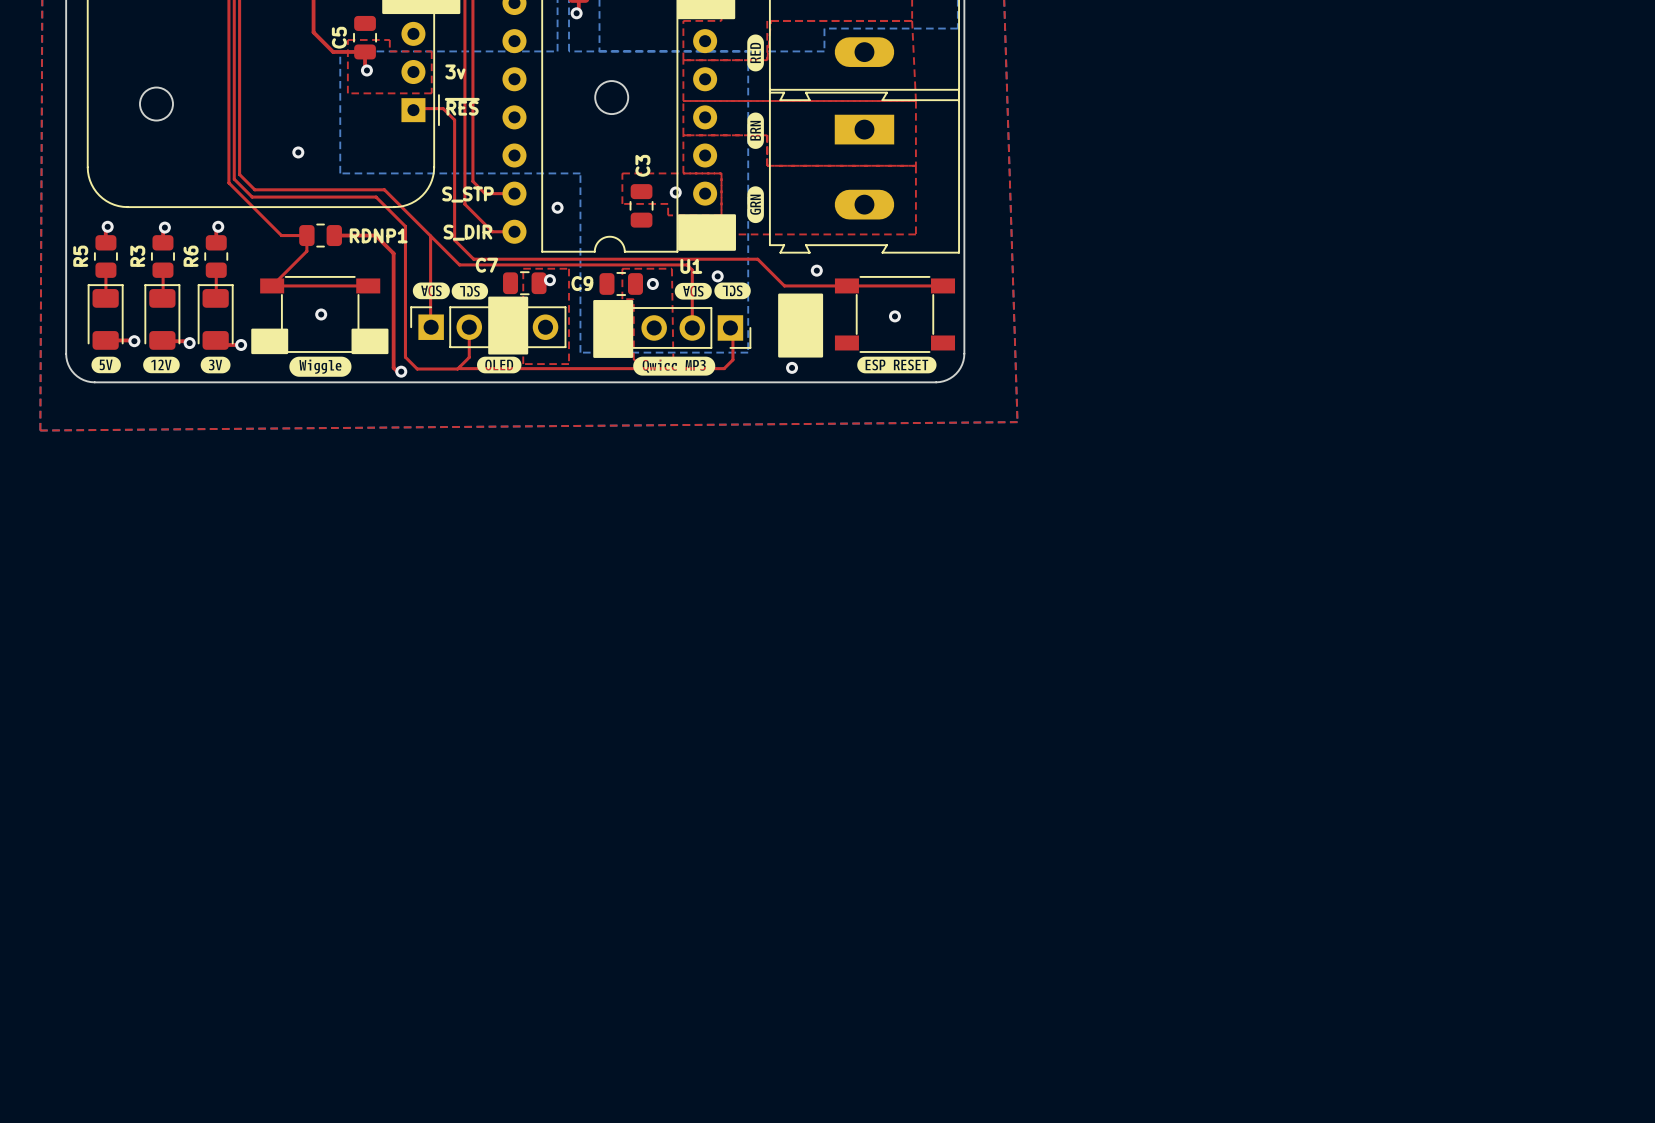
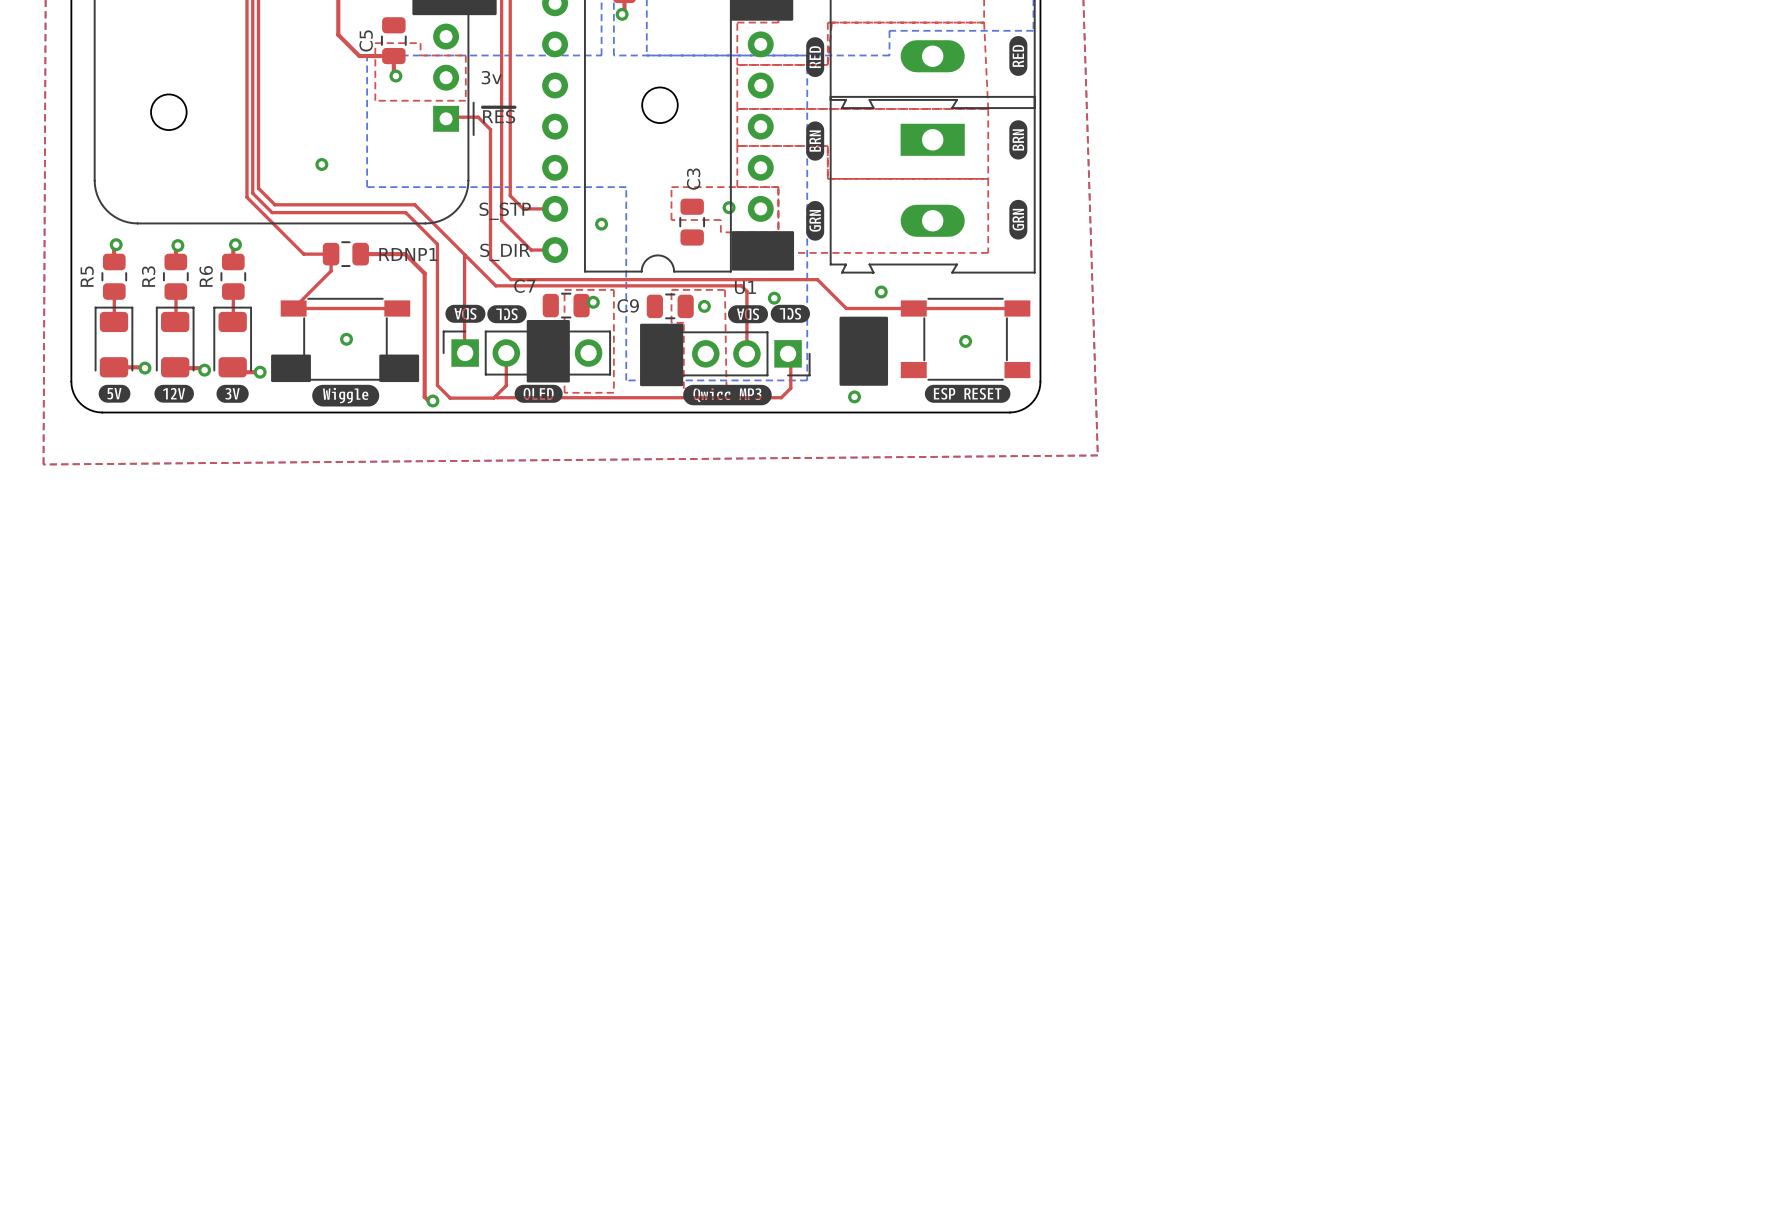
drawing: none -> [1009, 36, 1028, 76]
drawing: none -> [1009, 120, 1028, 160]
drawing: none -> [1009, 199, 1028, 240]

